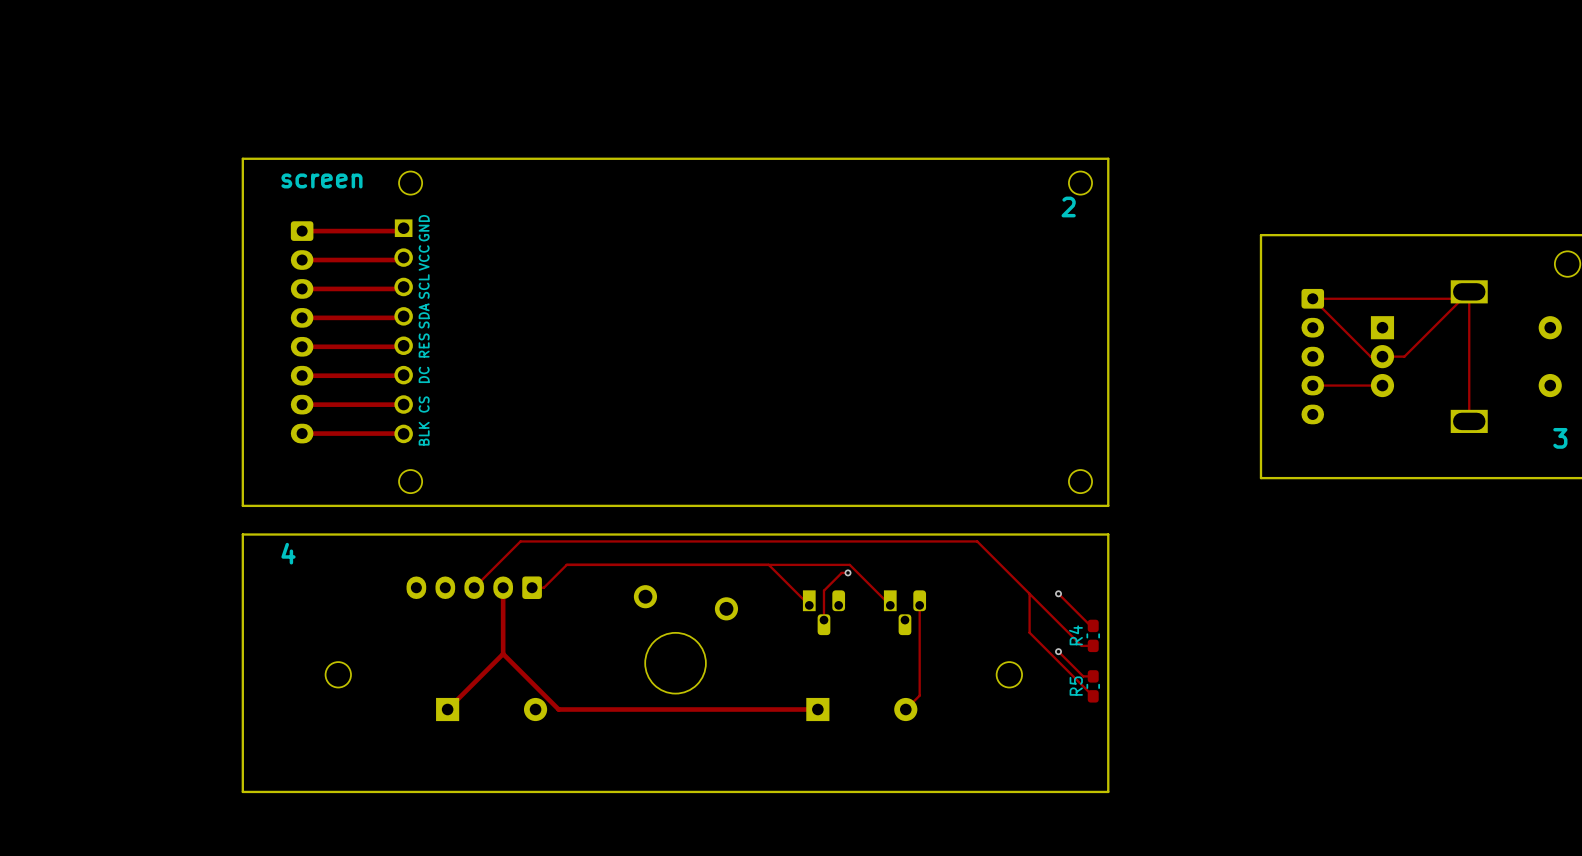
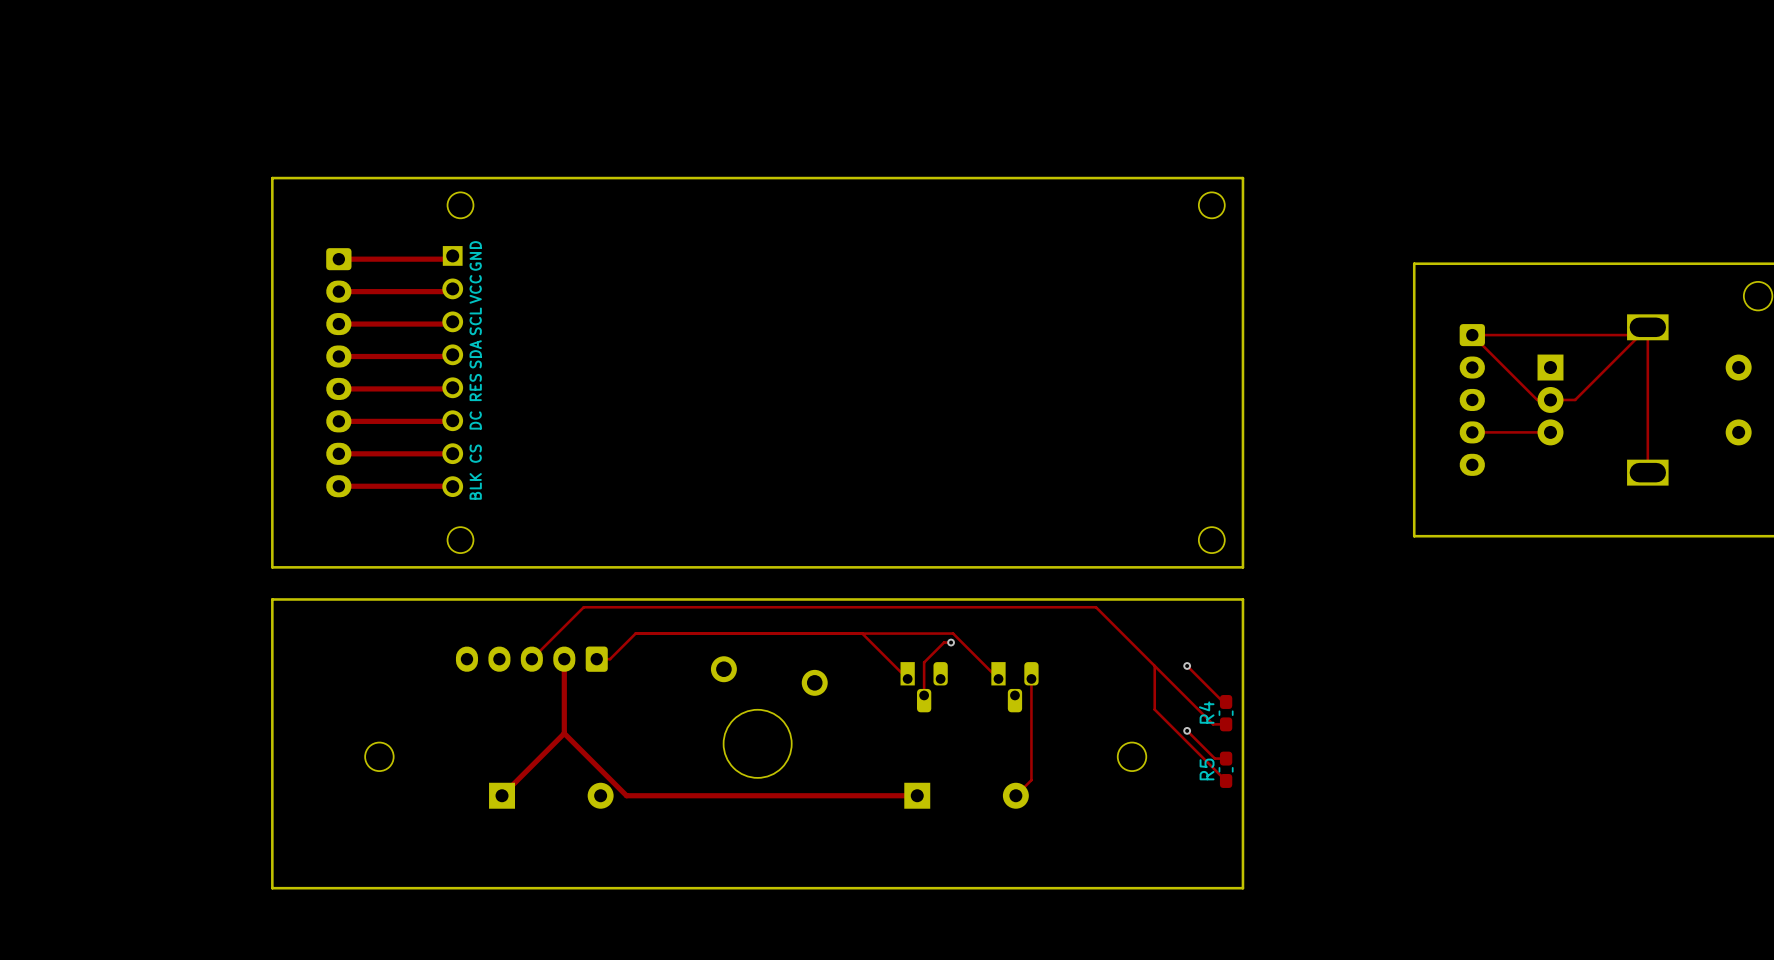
text: screen (321, 180) -> none
text: 2 (1068, 206) -> none
text: 3 (1560, 438) -> none
text: 4 (288, 553) -> none

